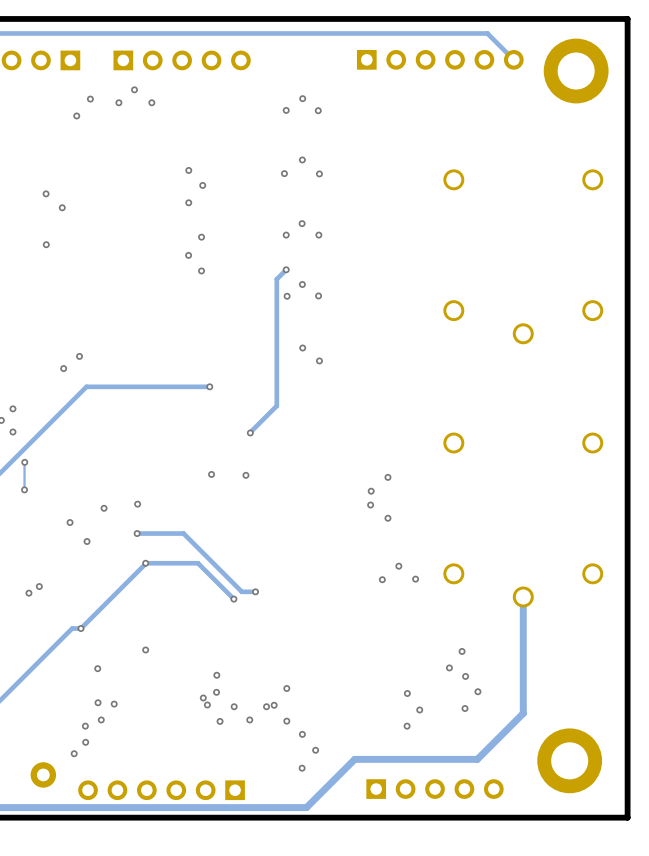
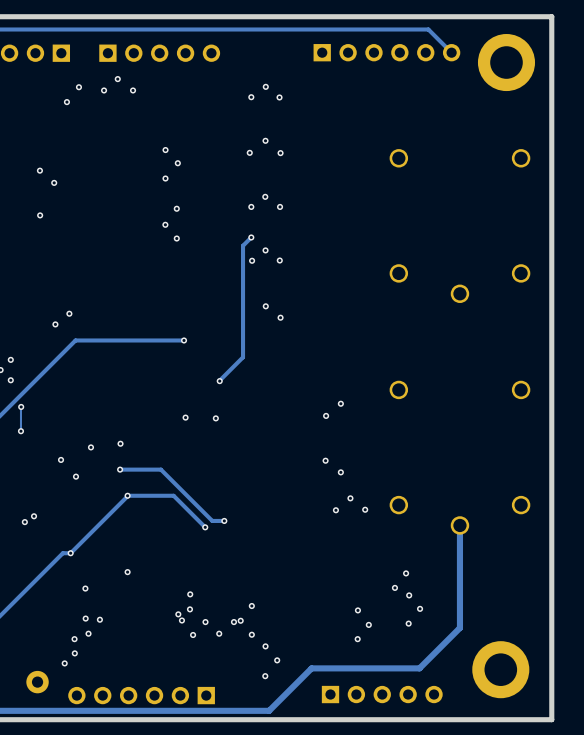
via: none -> (340, 403)
via: none -> (326, 415)
via: (387, 477) -> none
via: (371, 491) -> none
via: (370, 505) -> none
via: (387, 518) -> none
via: none -> (325, 460)
via: none -> (340, 472)

